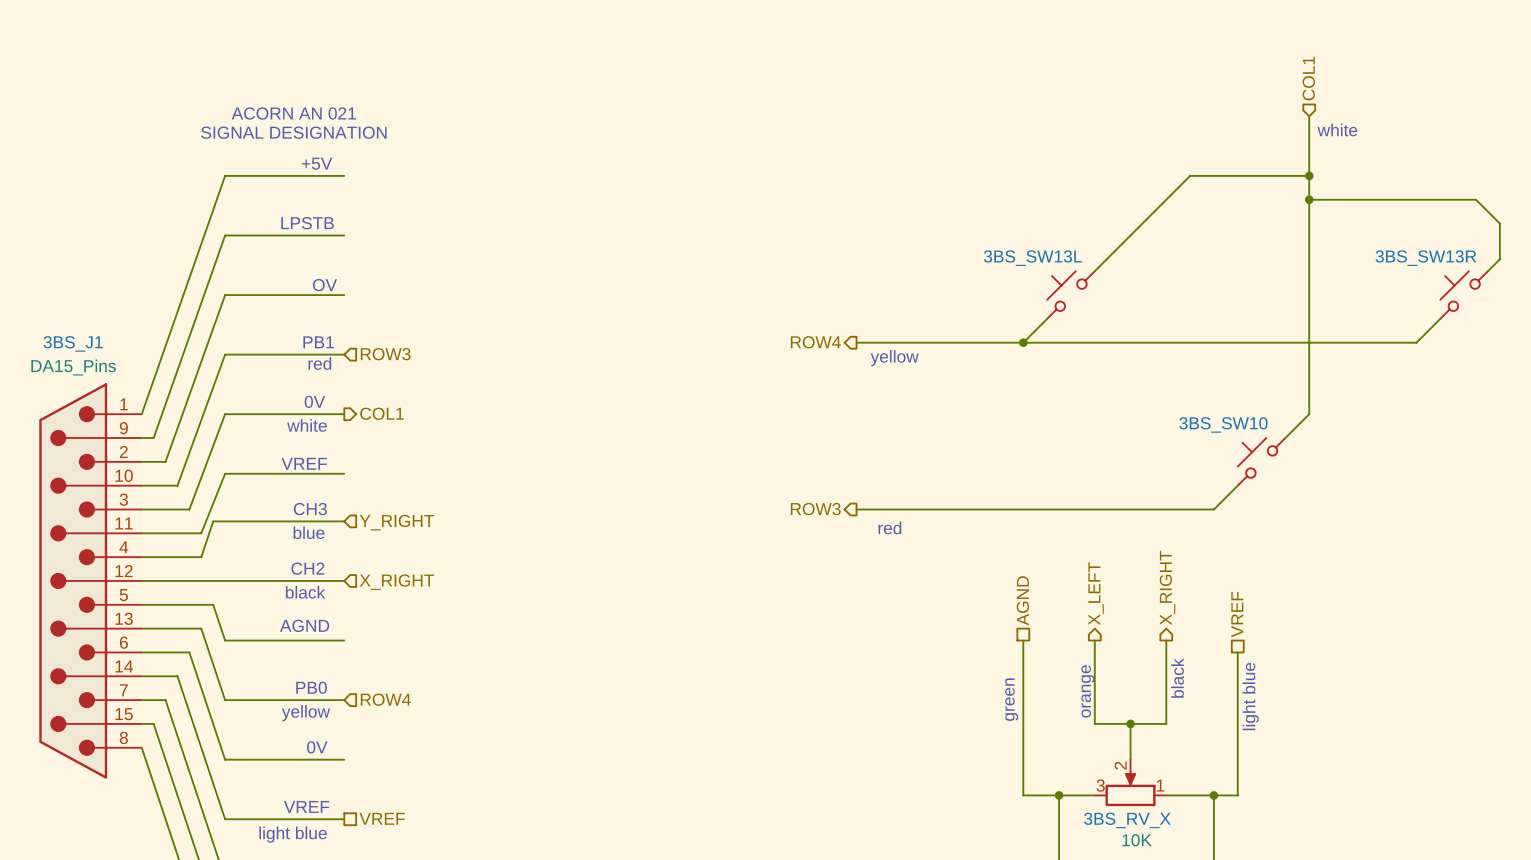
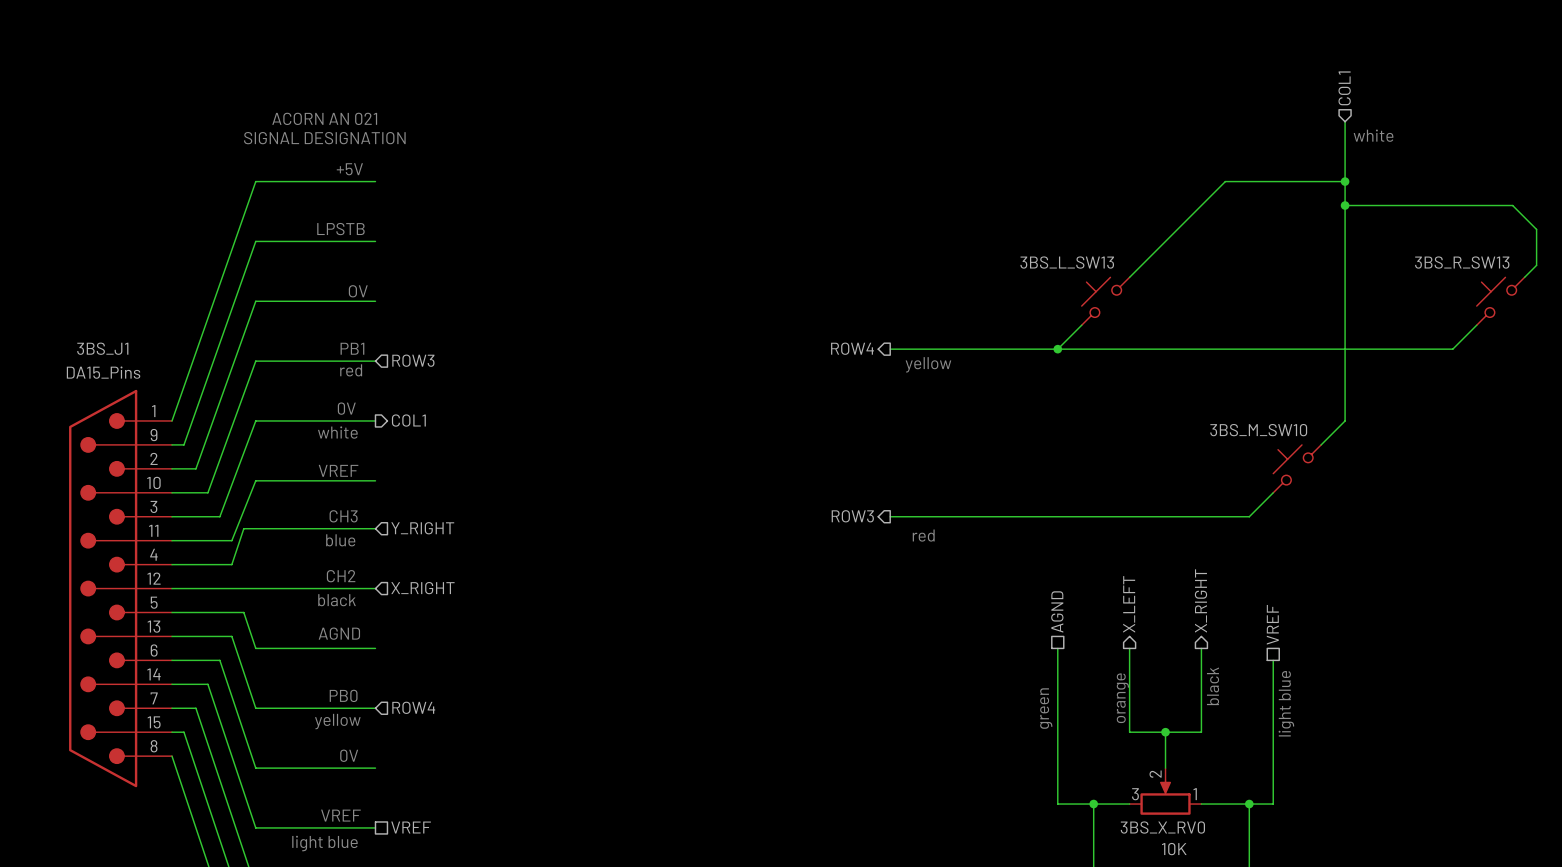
3BS_SW13L name: 3BS_SW13L (1032, 258) -> 3BS_L_SW13 (1067, 262)
3BS_SW13R name: 3BS_SW13R (1425, 258) -> 3BS_R_SW13 (1462, 262)
3BS_SW10 name: 3BS_SW10 (1223, 424) -> 3BS_M_SW10 (1258, 430)
3BS_RV_X name: 3BS_RV_X (1127, 820) -> 3BS_X_RV0 (1162, 827)

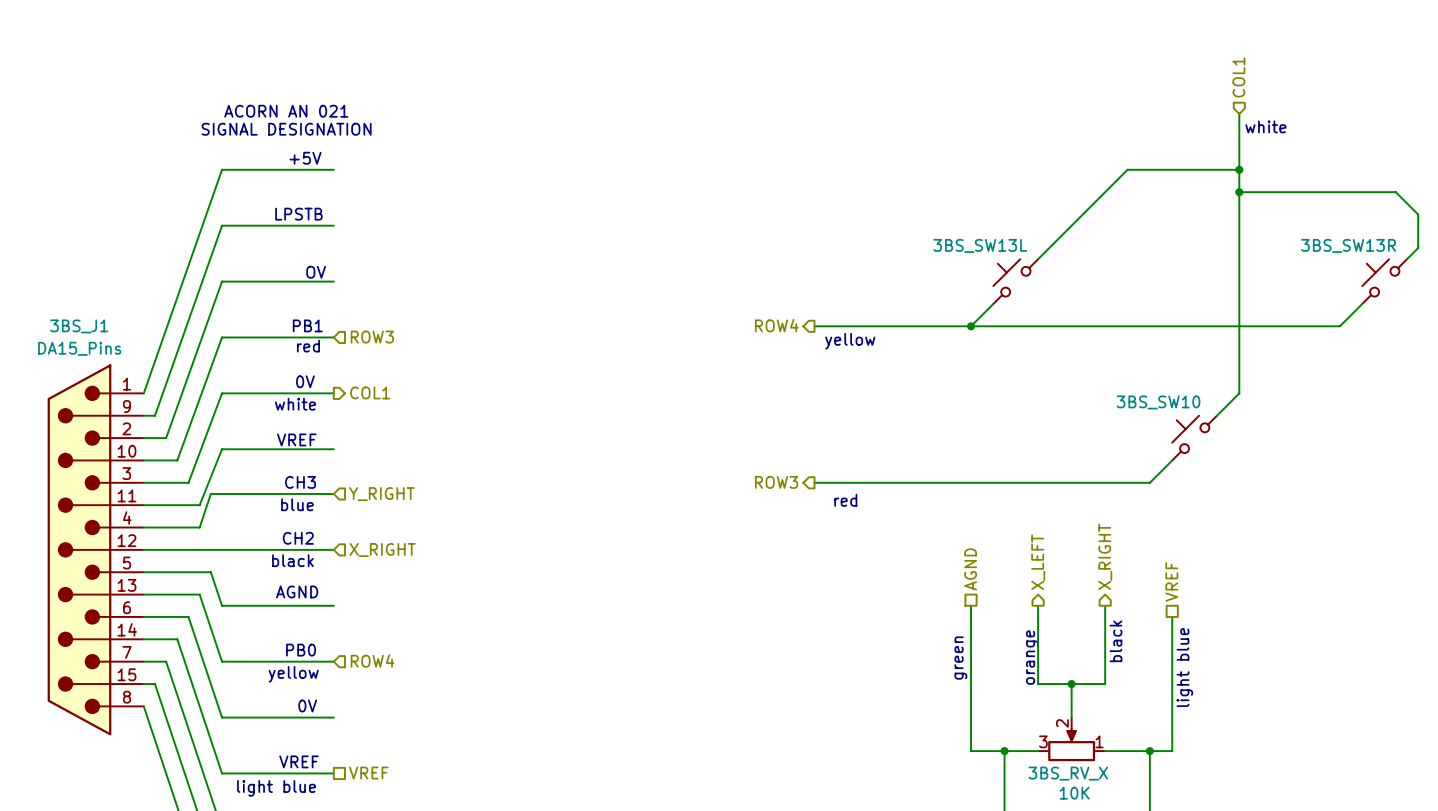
3BS_L_SW13 name: 3BS_L_SW13 (1067, 262) -> 3BS_SW13L (980, 245)
3BS_R_SW13 name: 3BS_R_SW13 (1462, 262) -> 3BS_SW13R (1348, 245)
3BS_M_SW10 name: 3BS_M_SW10 (1258, 430) -> 3BS_SW10 (1158, 402)
3BS_X_RV0 name: 3BS_X_RV0 (1162, 827) -> 3BS_RV_X (1068, 773)

